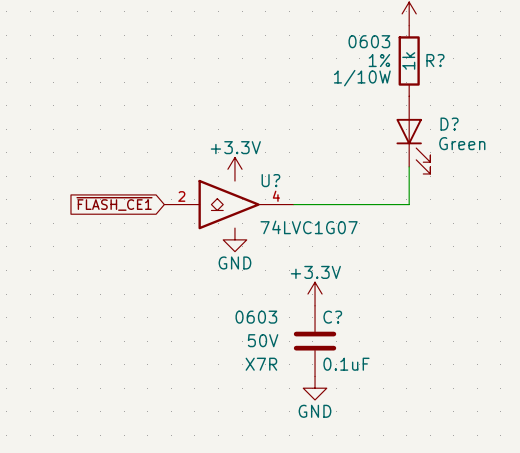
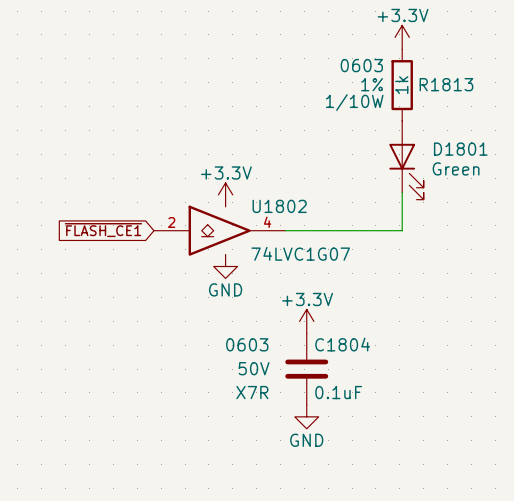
R? name: R? (435, 60) -> R1813 (446, 84)
D? name: D? (449, 124) -> D1801 (460, 149)
U? name: U? (270, 180) -> U1802 (279, 206)
C? name: C? (332, 317) -> C1804 (342, 344)

